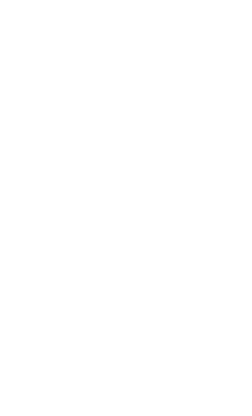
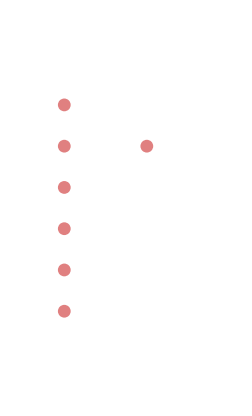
part: none -> (64, 104)
part: none -> (64, 146)
part: none -> (146, 146)
part: none -> (64, 187)
part: none -> (64, 228)
part: none -> (64, 269)
part: none -> (64, 311)

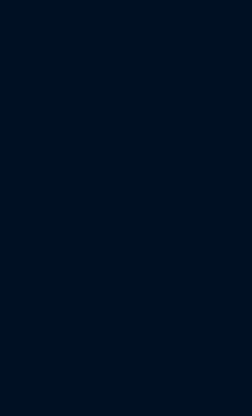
part: (64, 104) -> none
part: (64, 146) -> none
part: (146, 146) -> none
part: (64, 187) -> none
part: (64, 228) -> none
part: (64, 269) -> none
part: (64, 311) -> none

